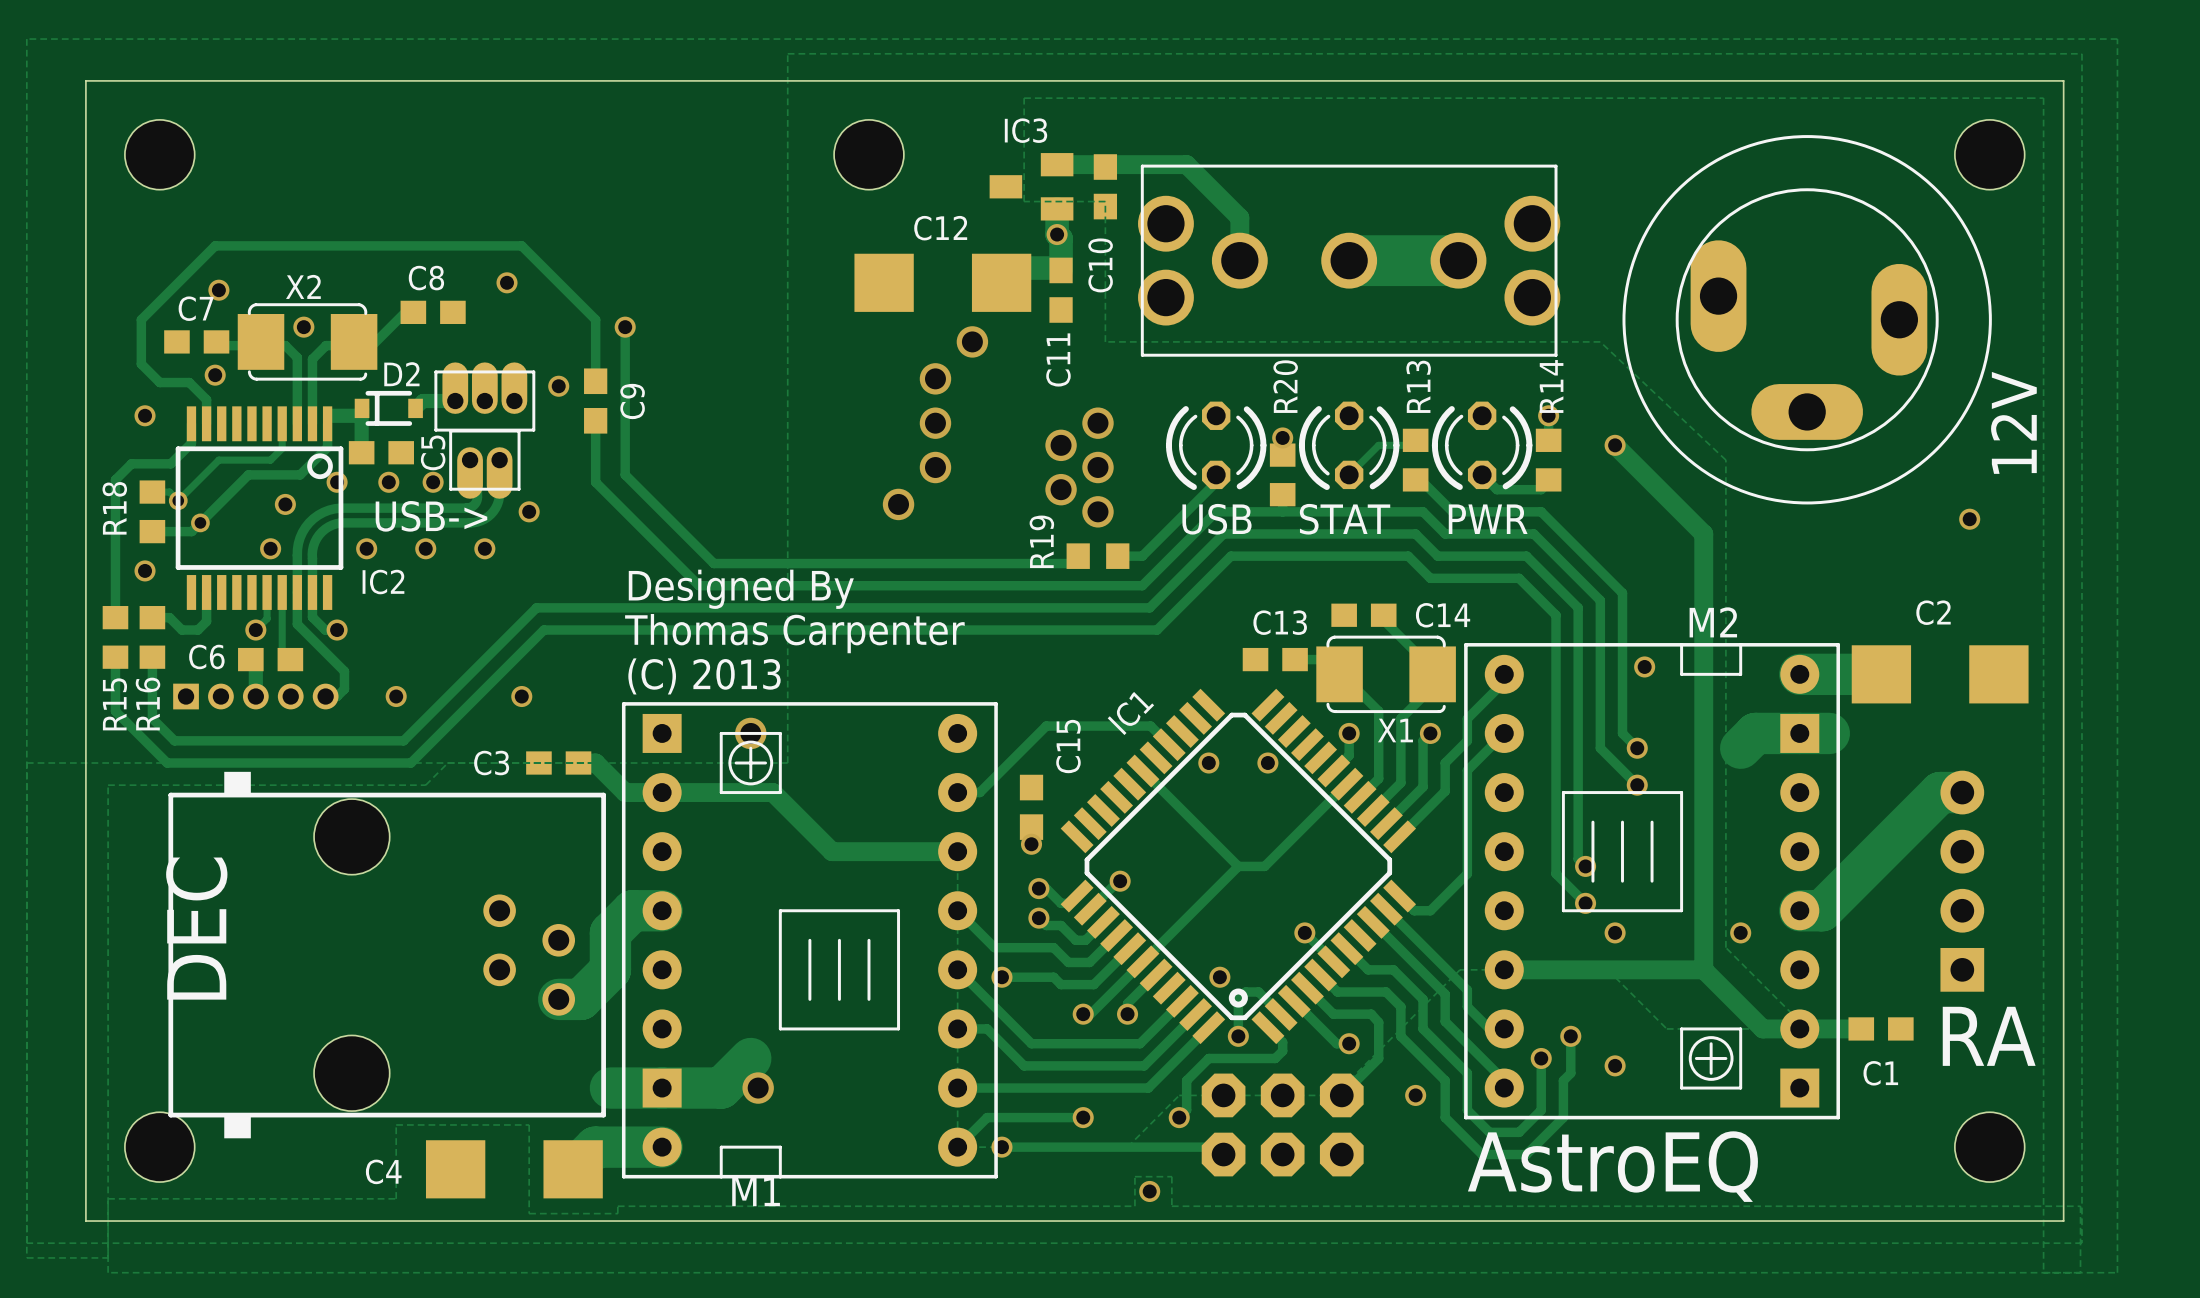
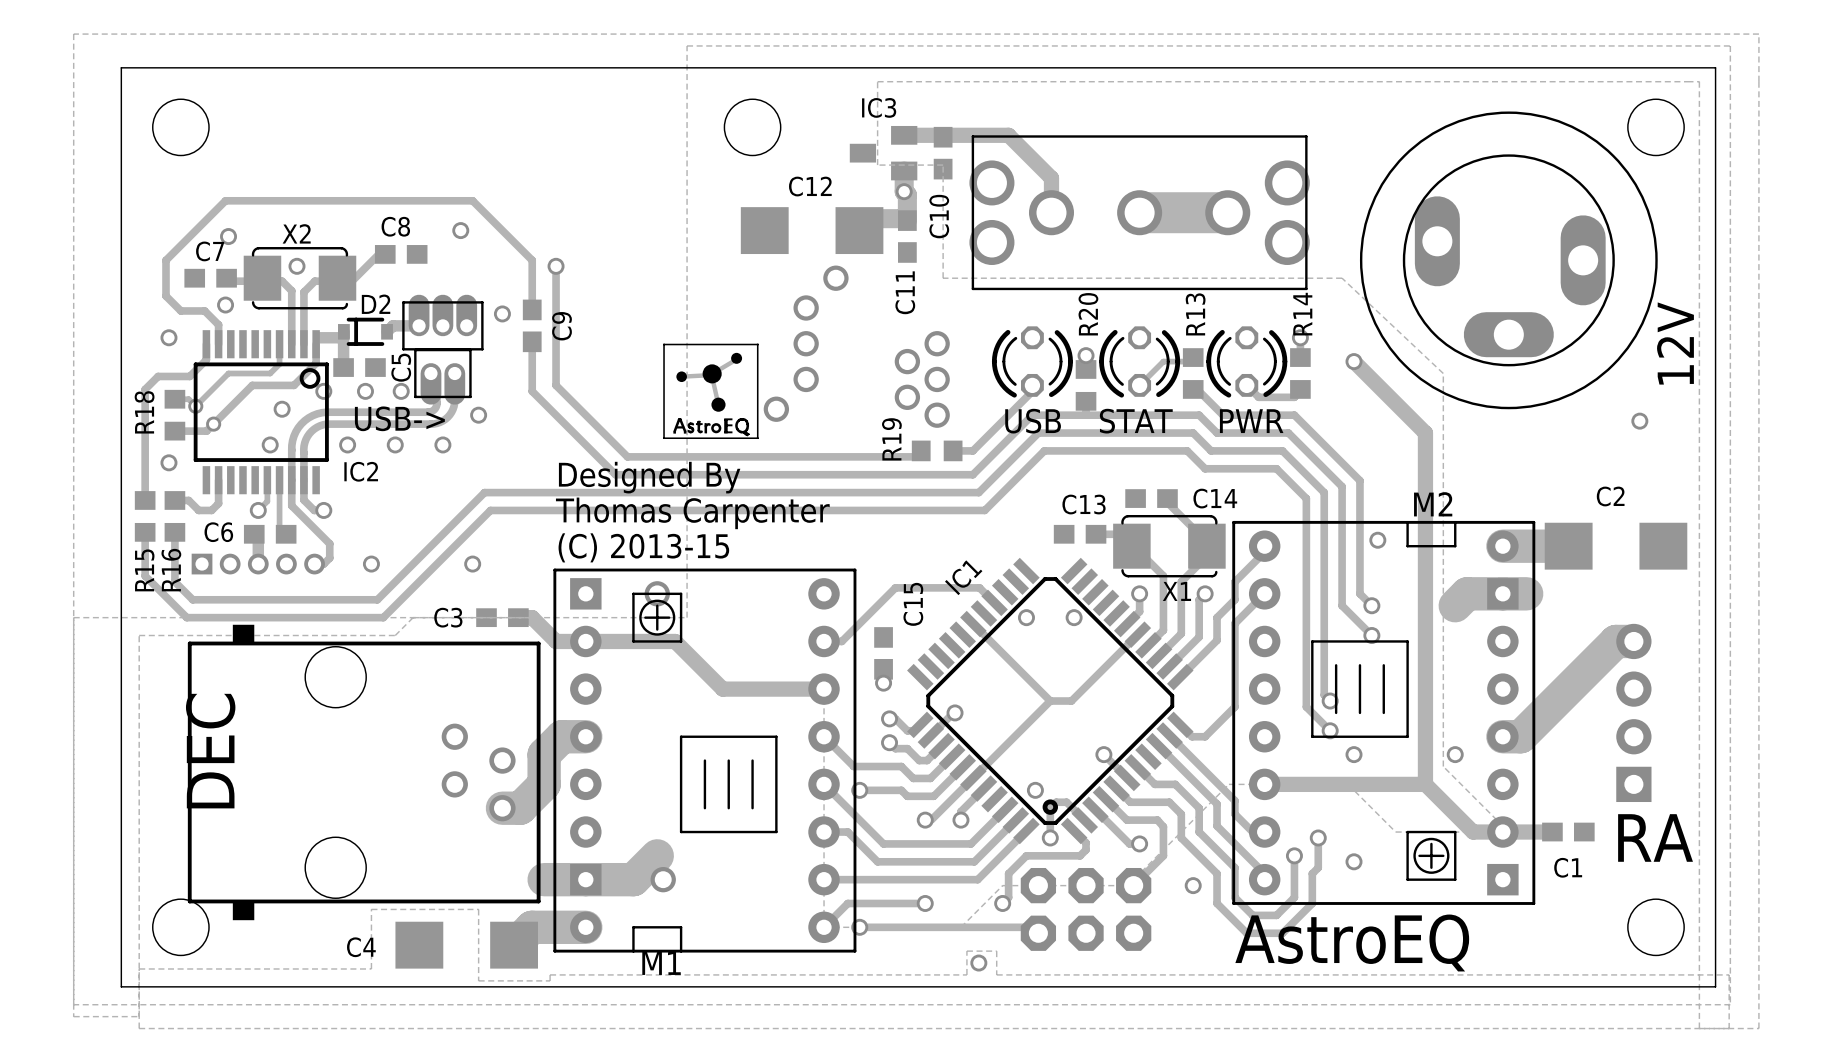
drawing: none -> [663, 343, 759, 440]
text: (C) 2013 (704, 676) -> (C) 2013-15 (643, 547)

